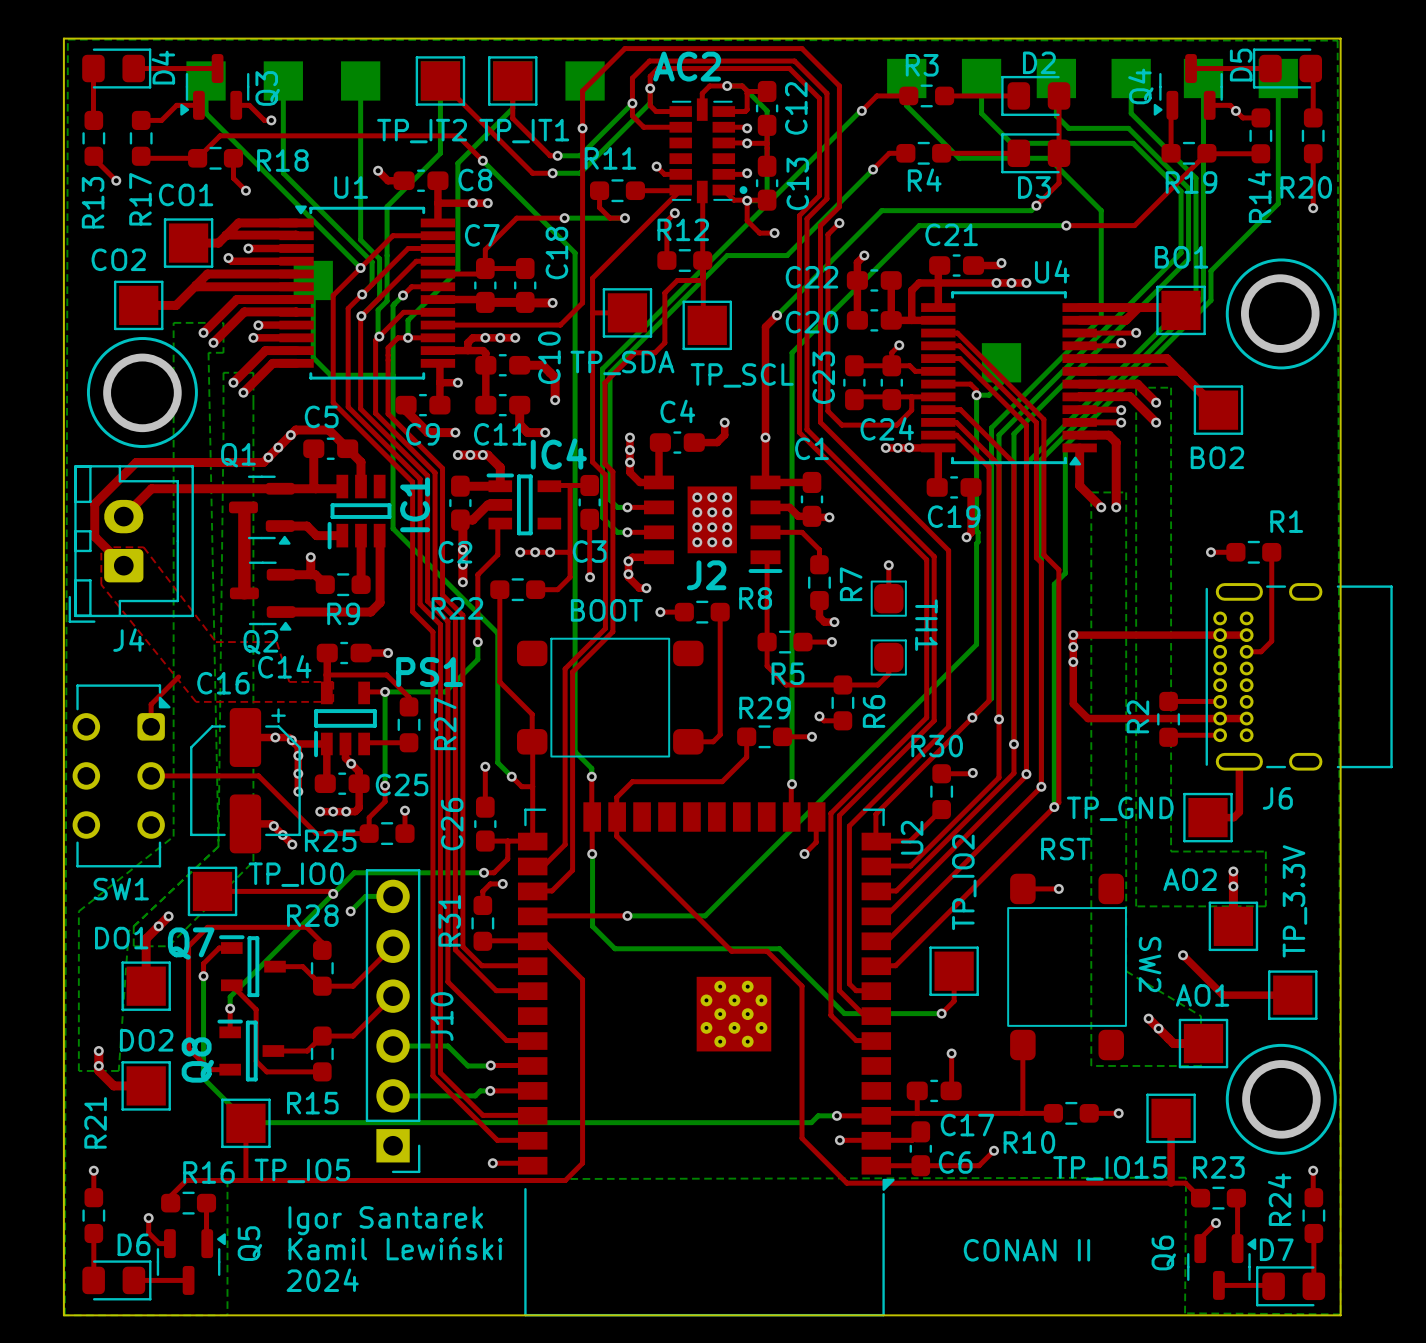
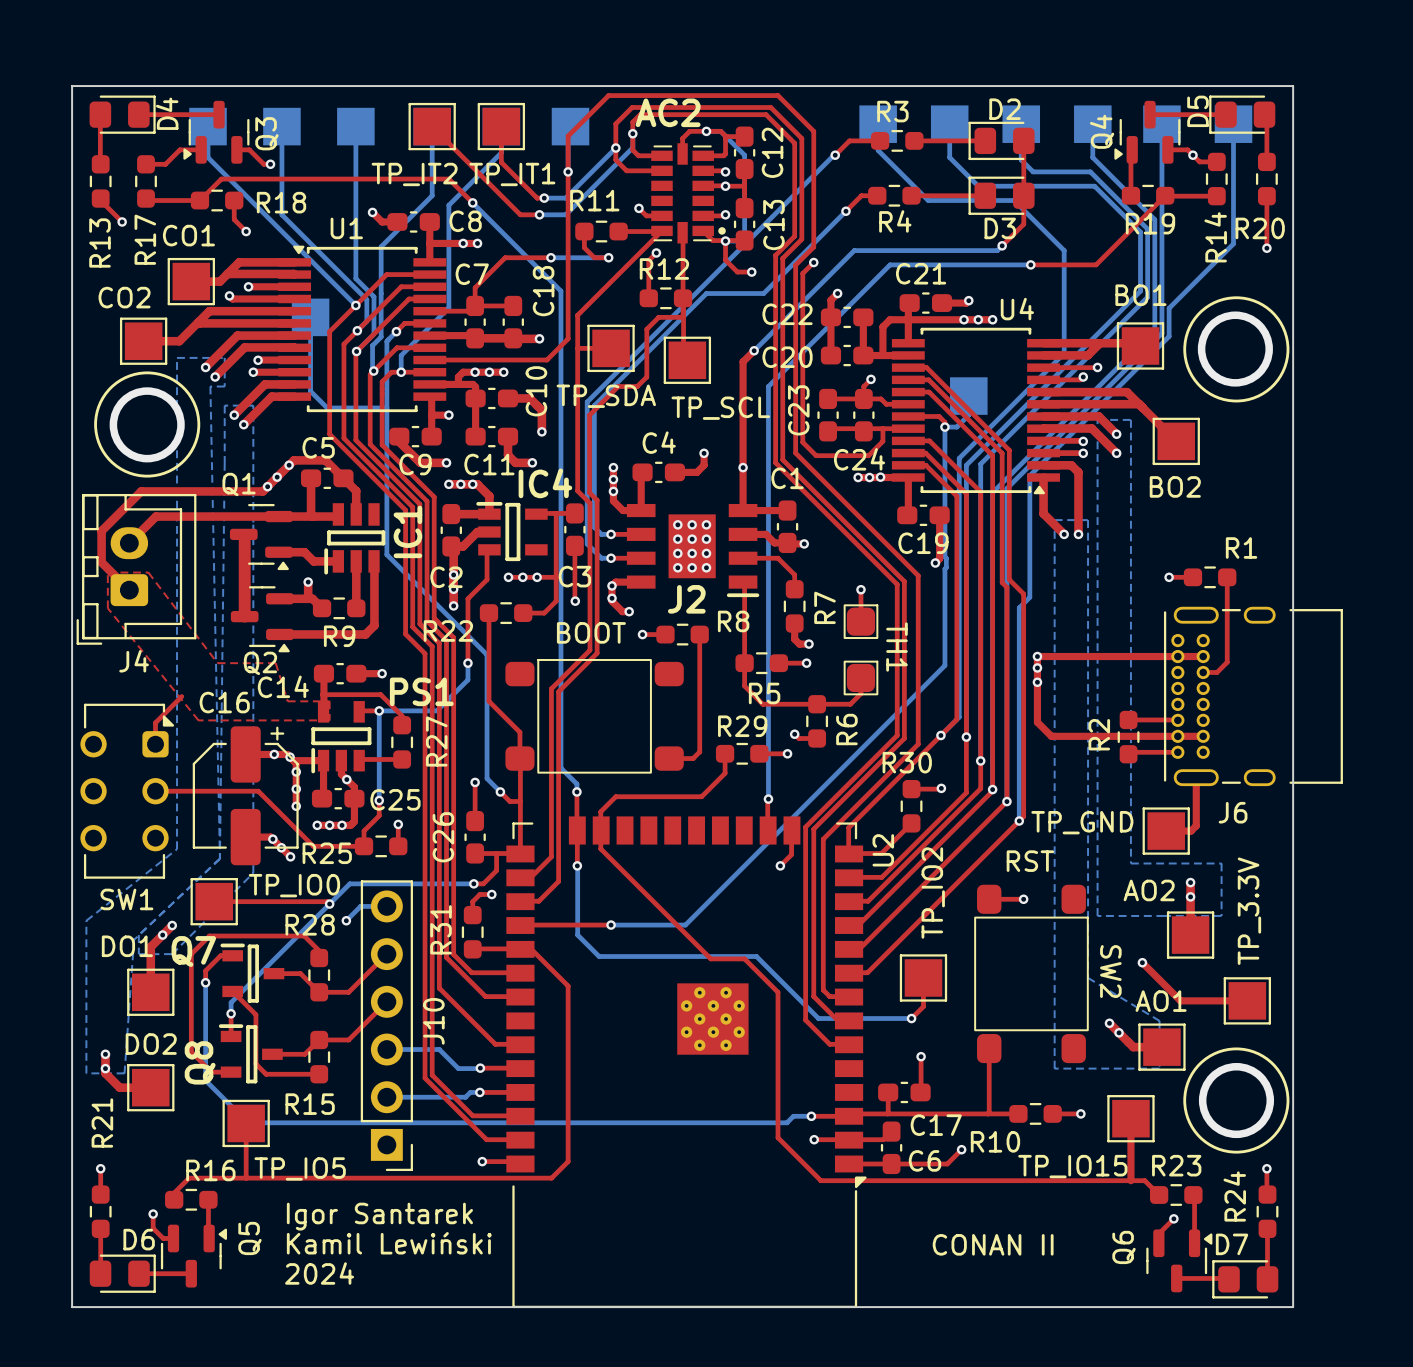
bottom zone outline: (67, 39) (1337, 40) (1340, 1314) (1185, 1313) (1186, 1177) (227, 1179) (227, 1315) (64, 1315) (67, 39) -> none

